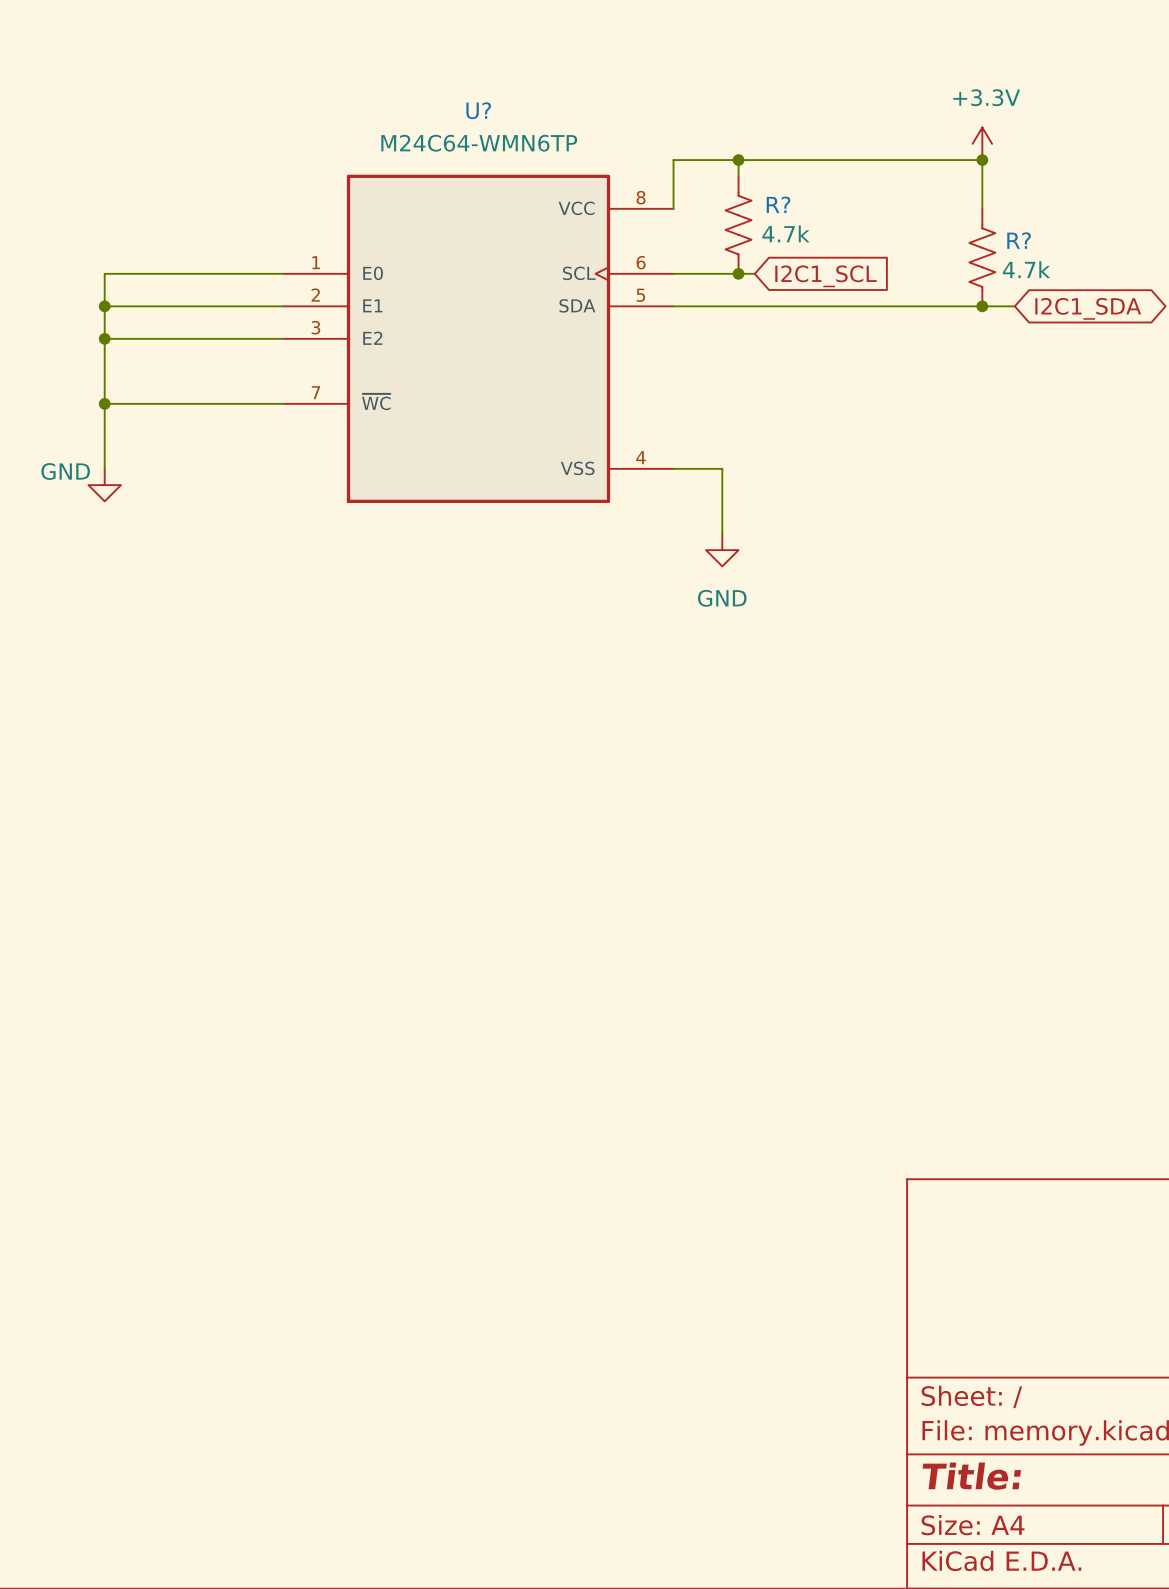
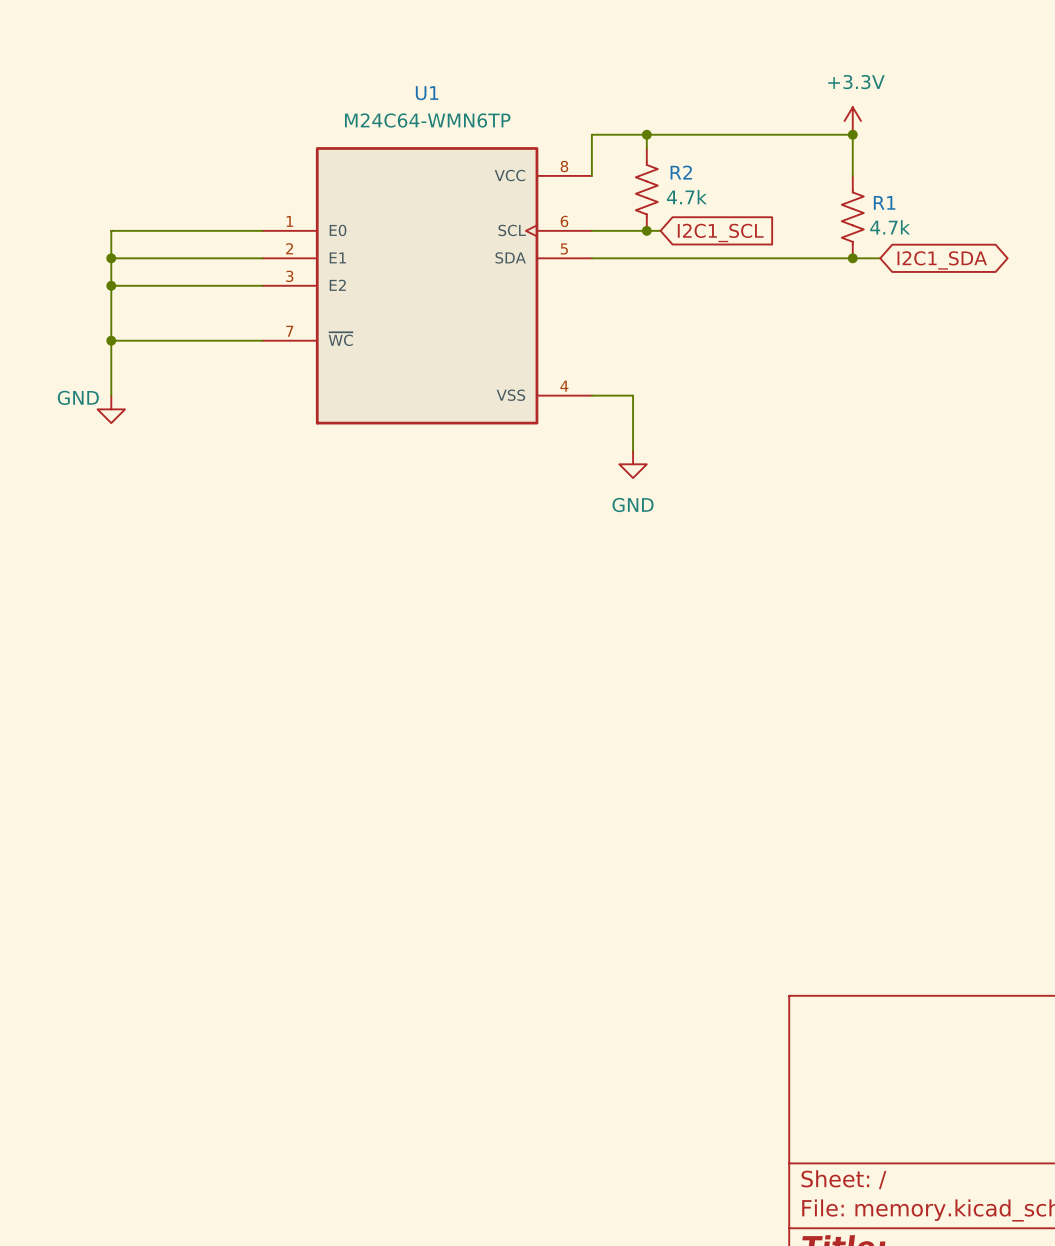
U? name: U? (478, 110) -> U1 (427, 93)
R? name: R? (778, 204) -> R2 (681, 172)
R? name: R? (1019, 240) -> R1 (884, 202)

